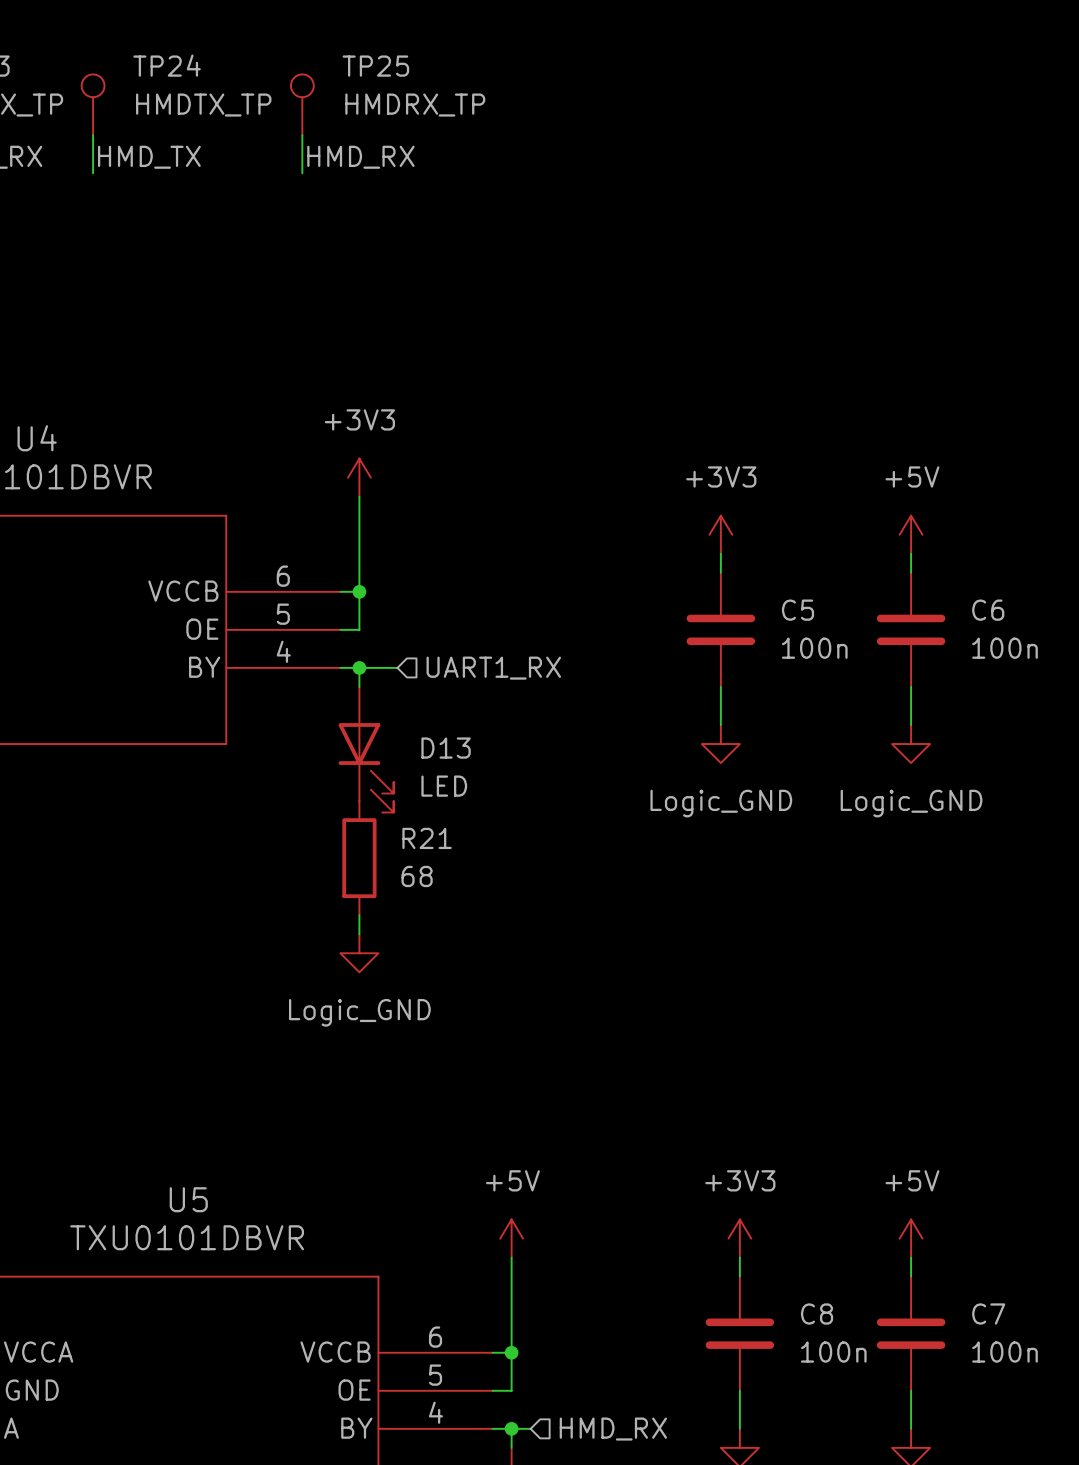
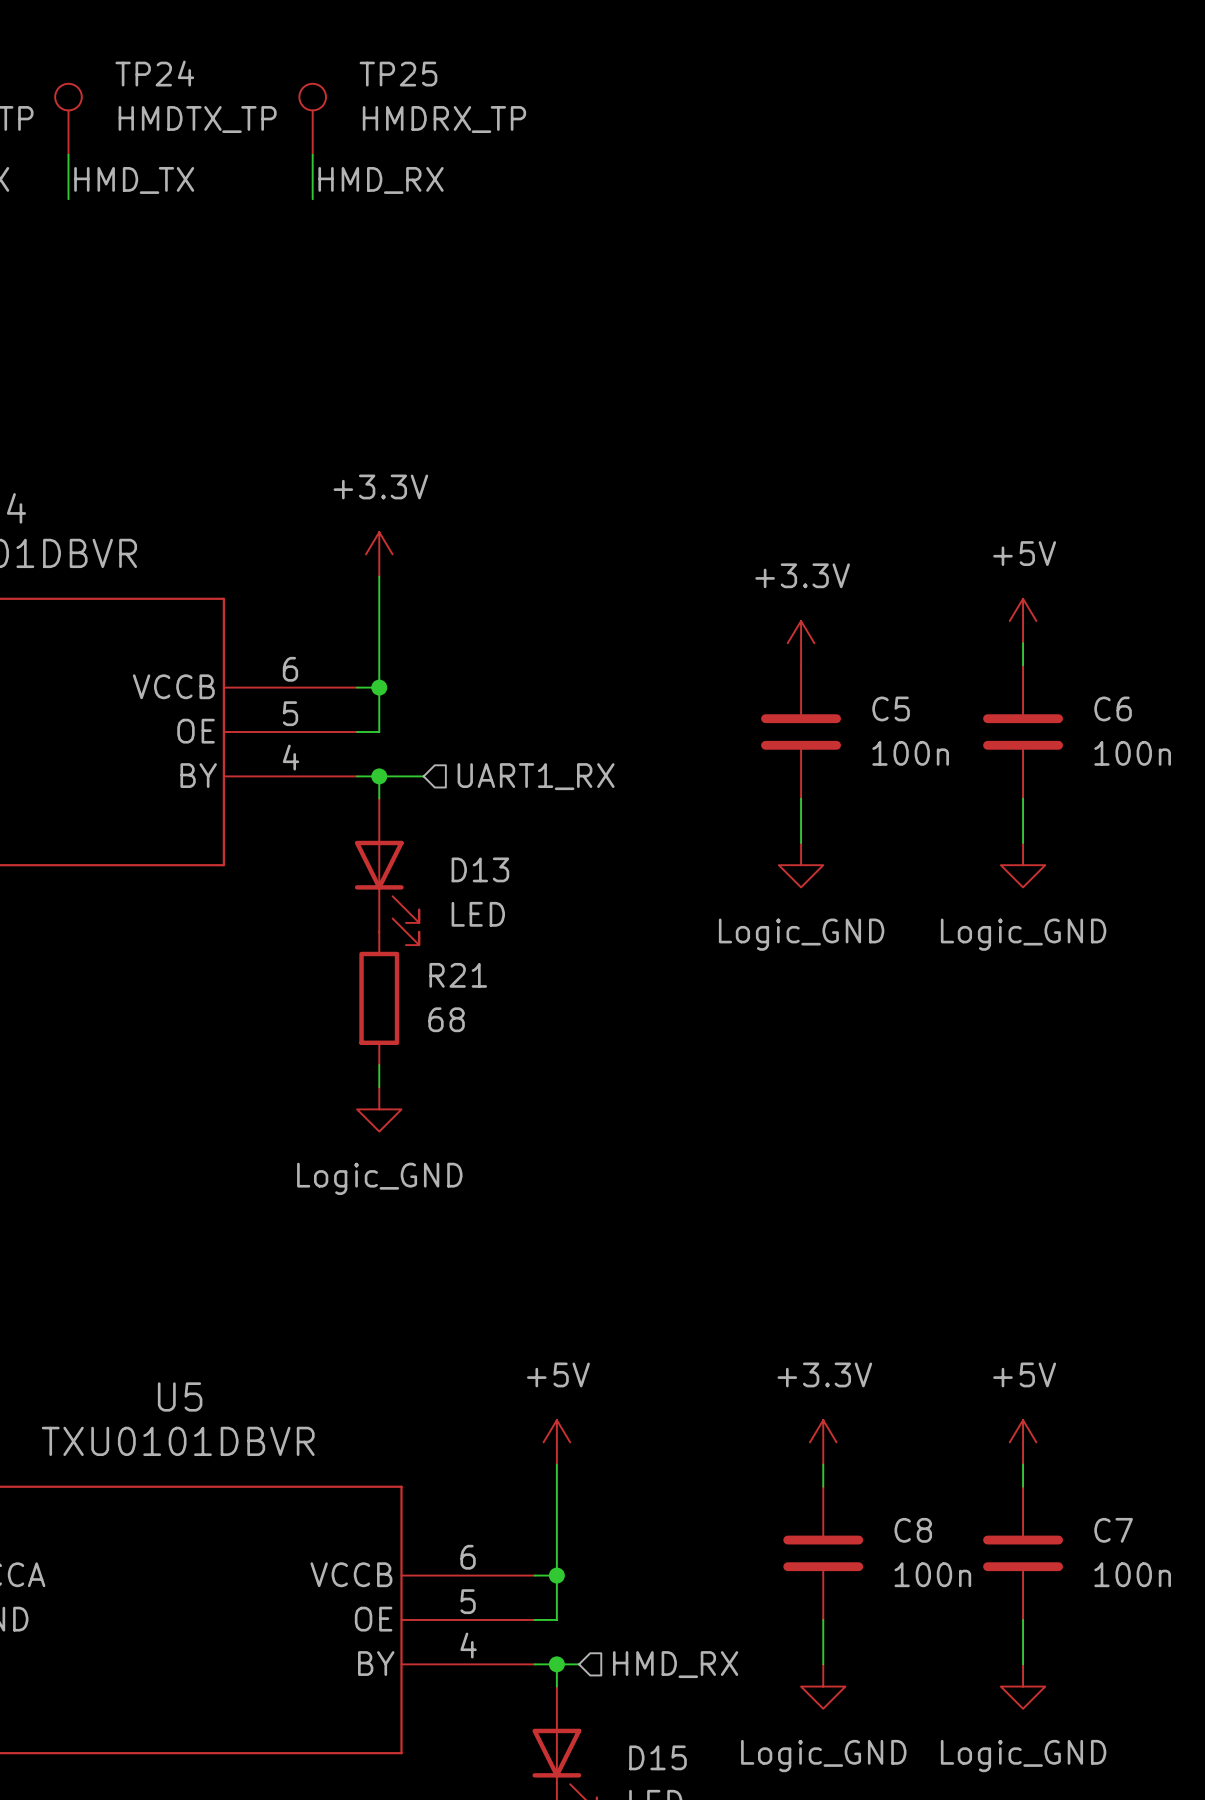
power symbol: +3V3 (359, 477) -> +3.3V (379, 554)
power symbol: +3V3 (720, 534) -> none
power symbol: none -> +3.3V (801, 643)
power symbol: +3V3 (739, 1238) -> +3.3V (823, 1442)

